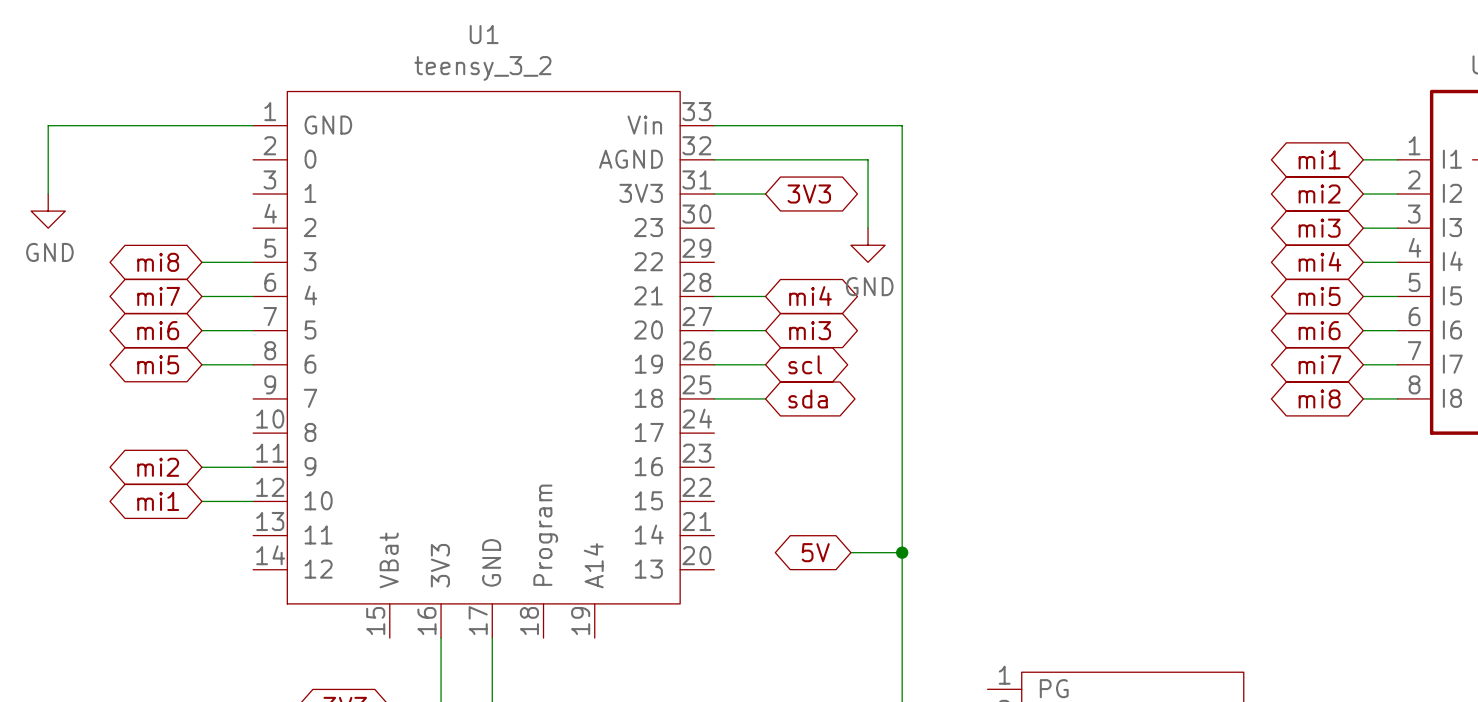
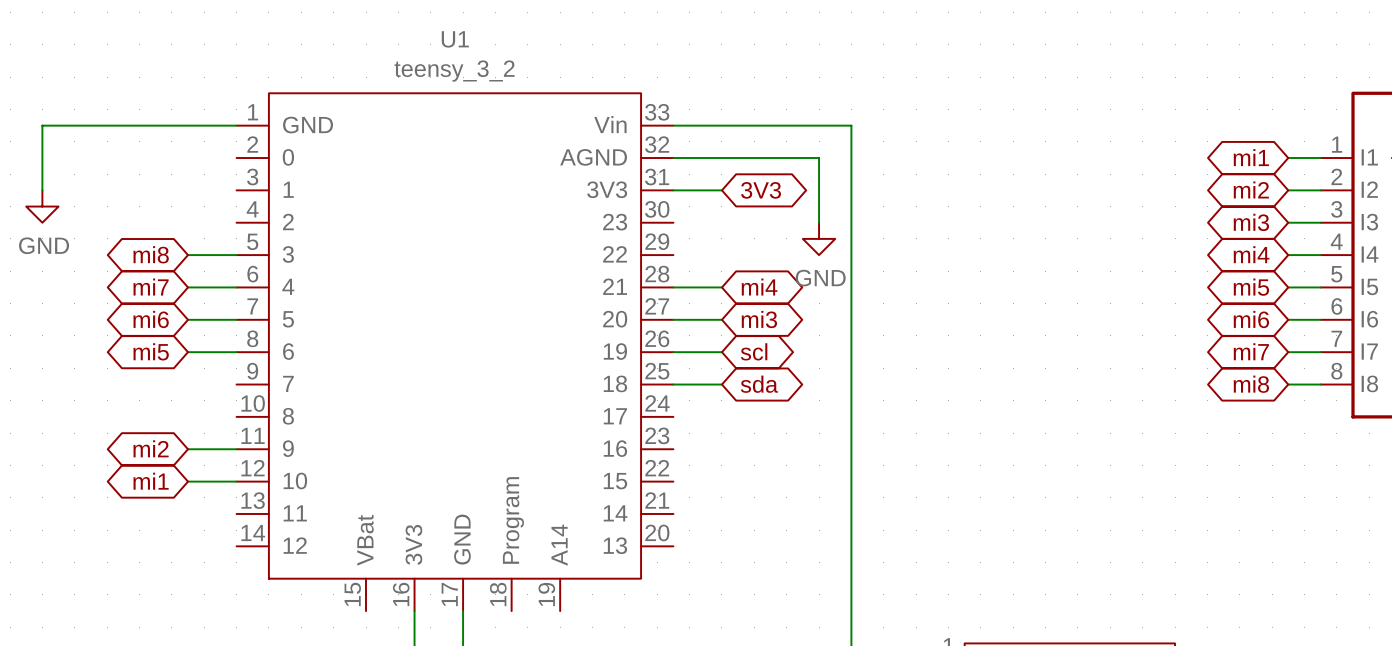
global label: 5V (815, 552) -> none
wire: (850, 552) (902, 552) -> none
junction: (902, 552) -> none

